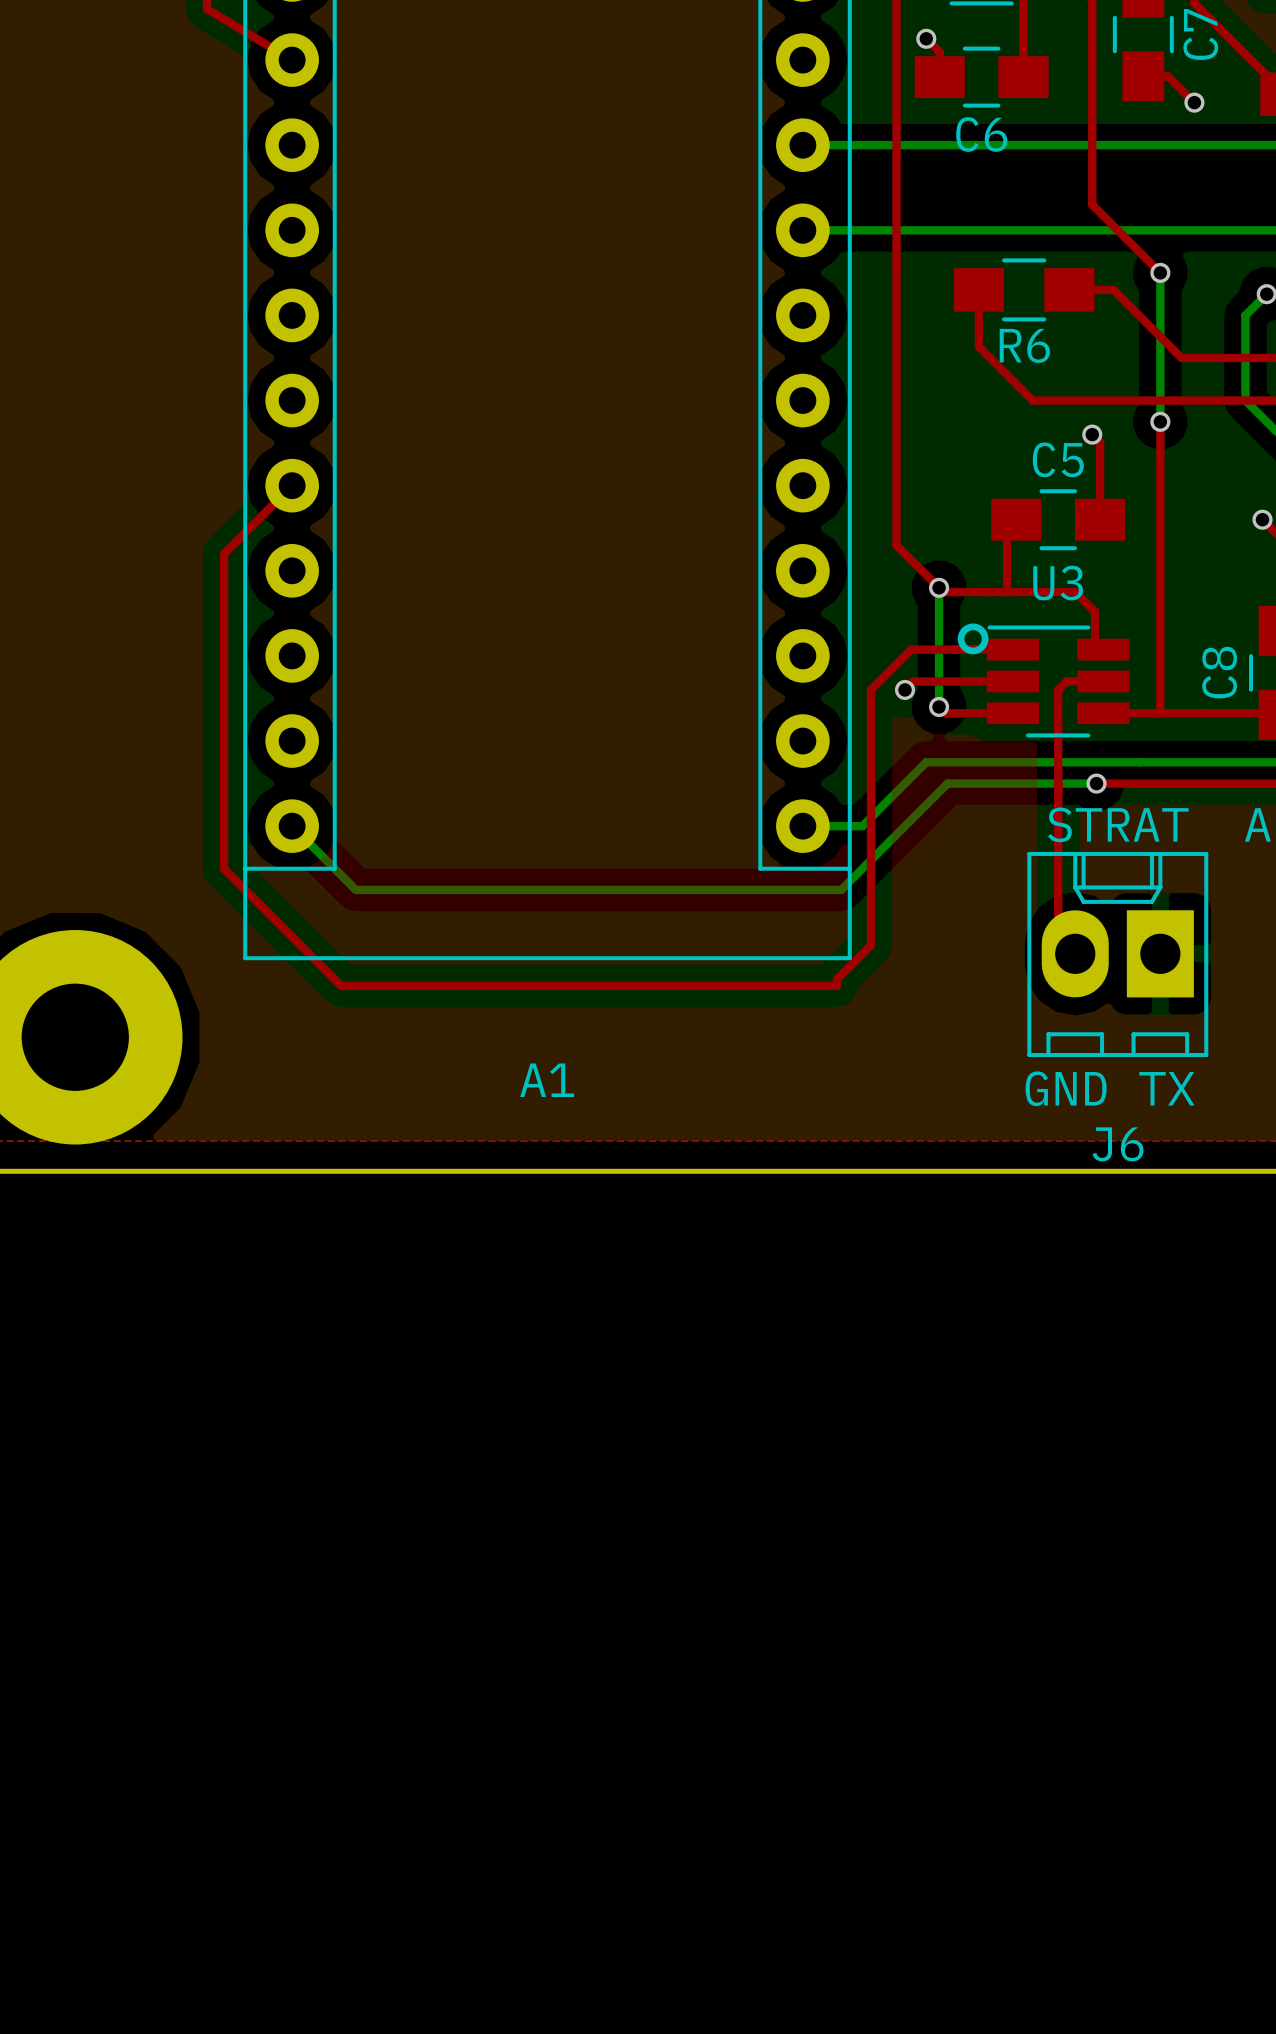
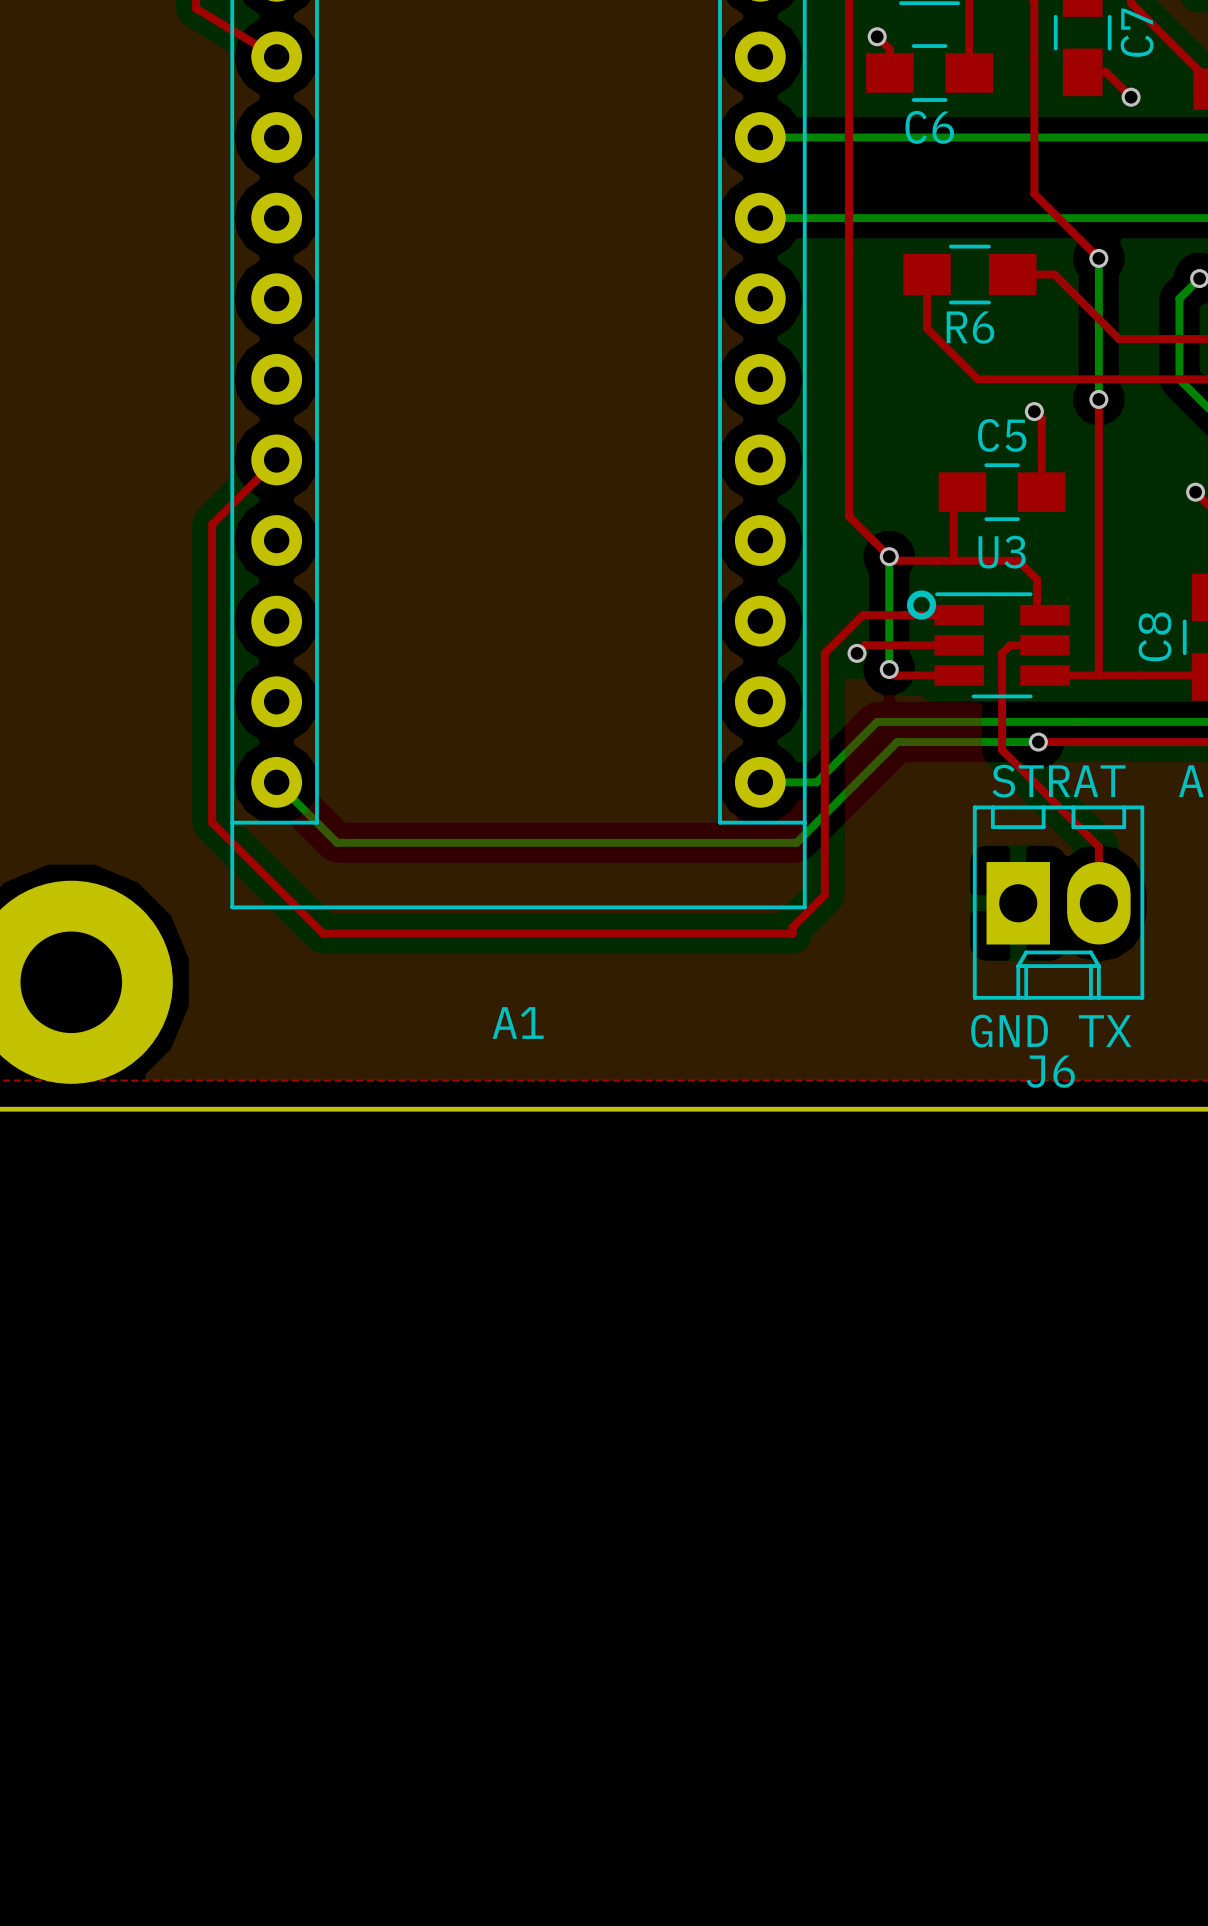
top track: (1058, 792) (1058, 936) (1075, 953) -> (1002, 750) (1098, 846) (1098, 903)
J6 rotation: 0° (1117, 954) -> 180° (1058, 902)

